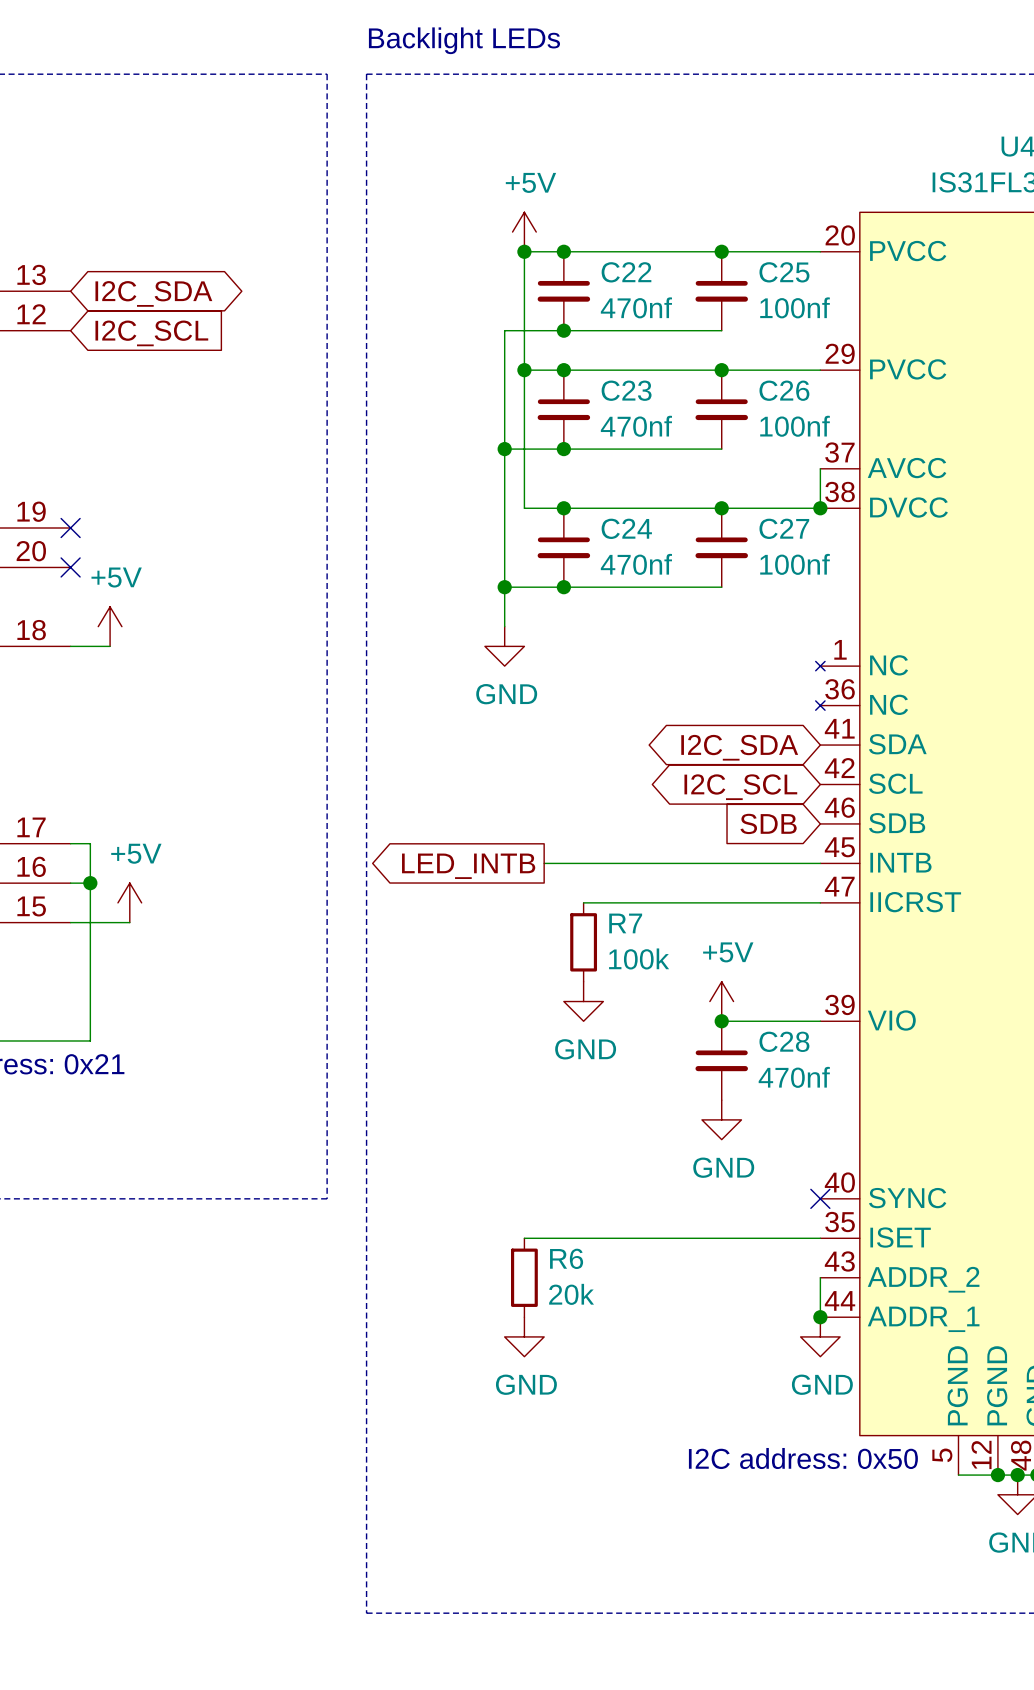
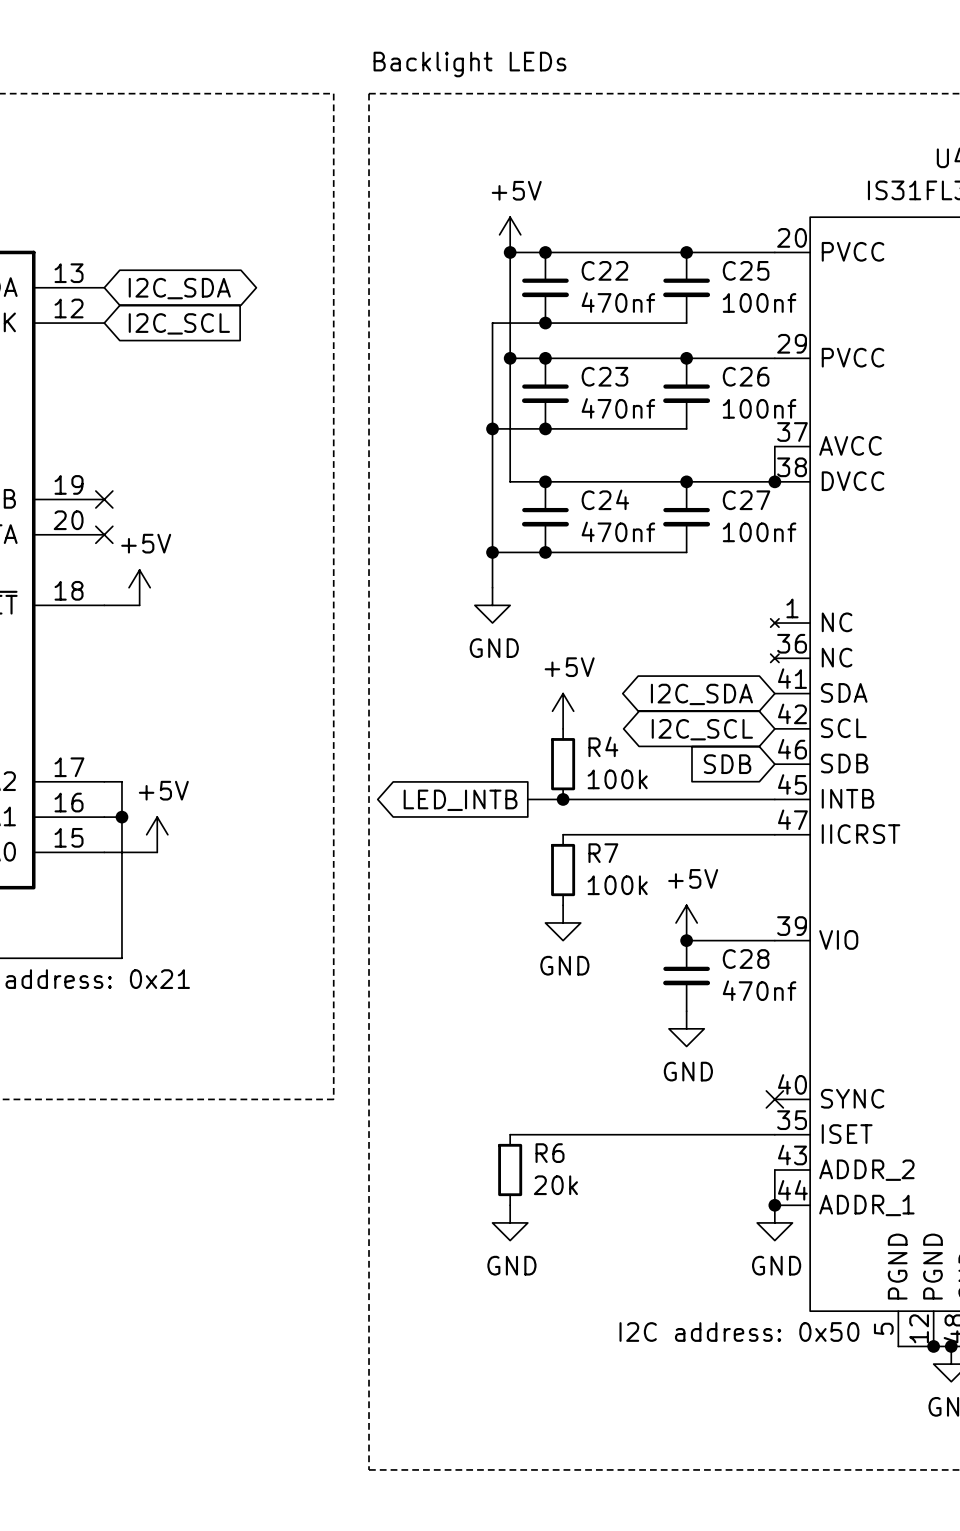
power symbol: none -> +5V (563, 711)
R4: none -> 100k (563, 764)
junction: none -> (563, 799)

